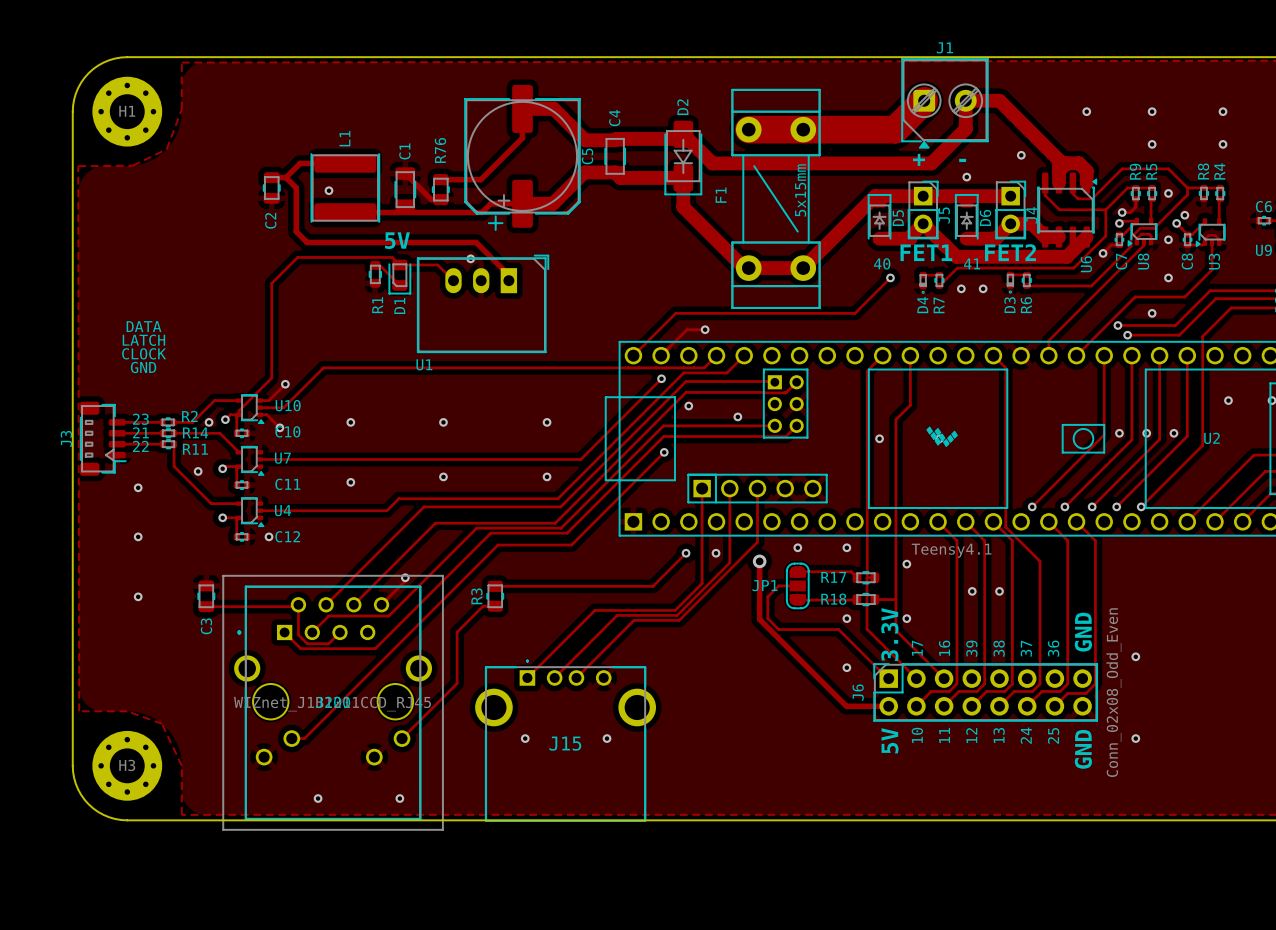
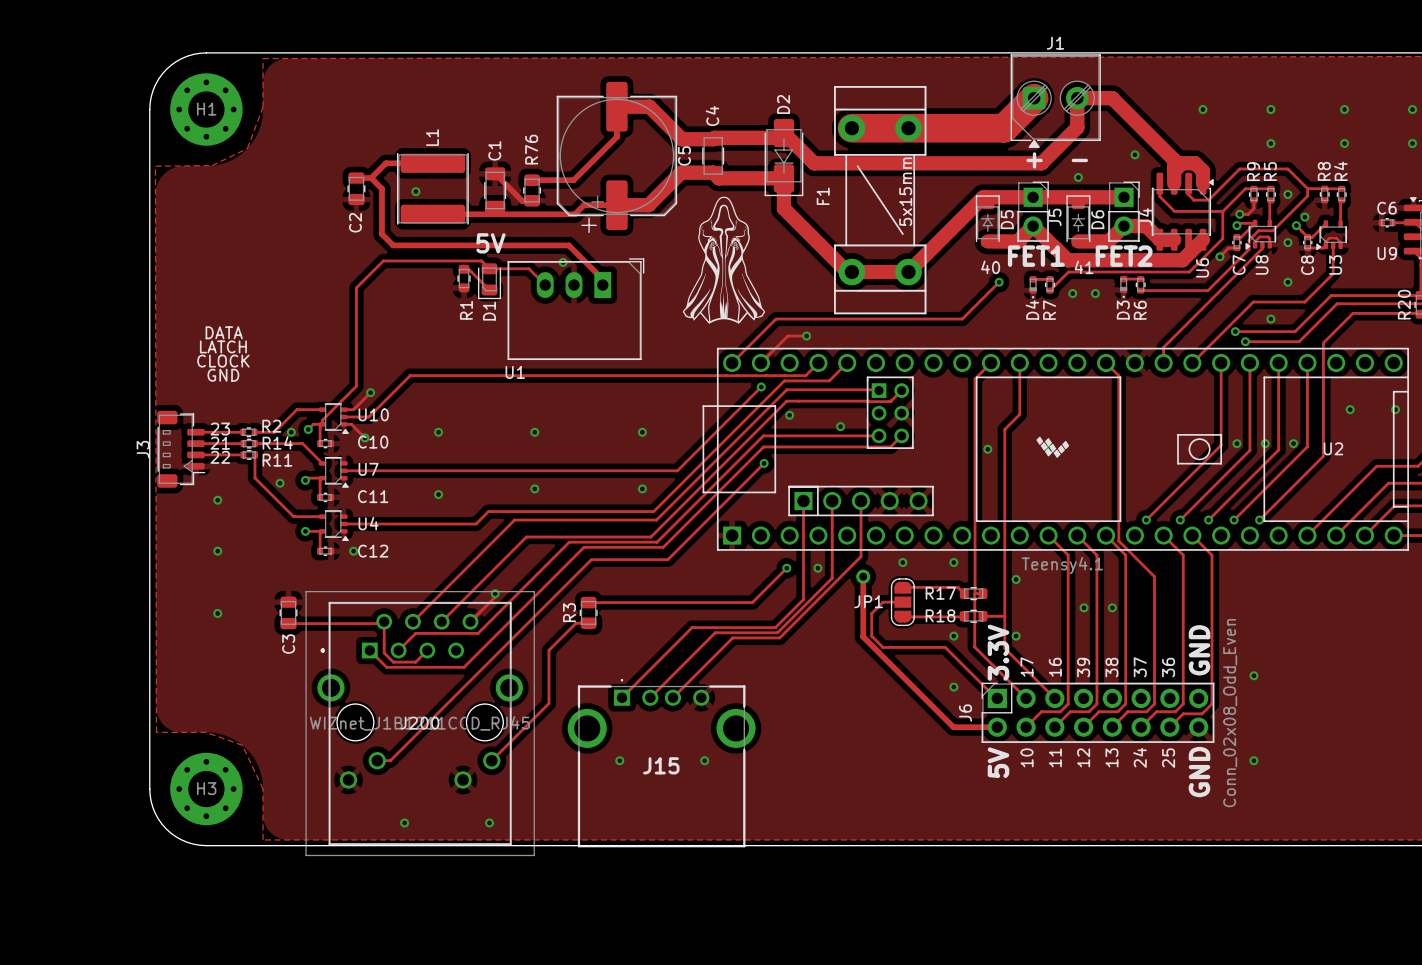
drawing: none -> [682, 196, 766, 324]

